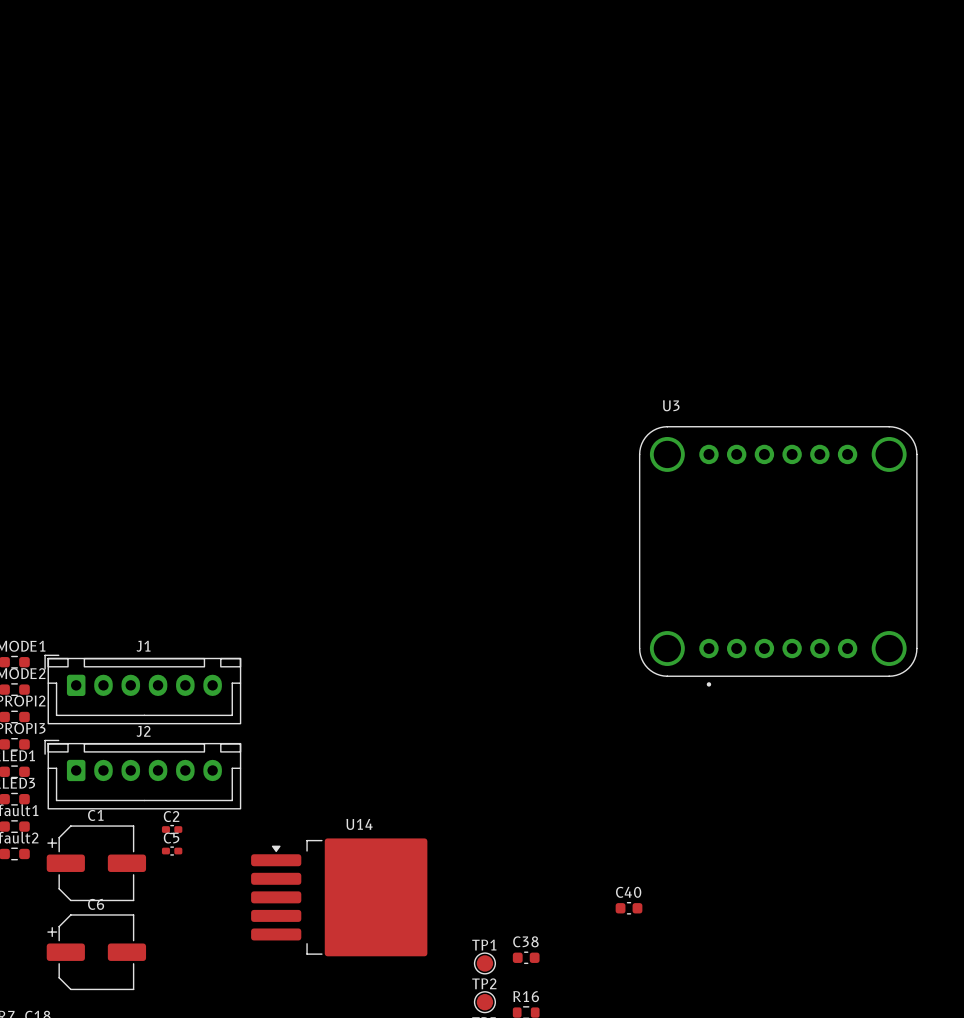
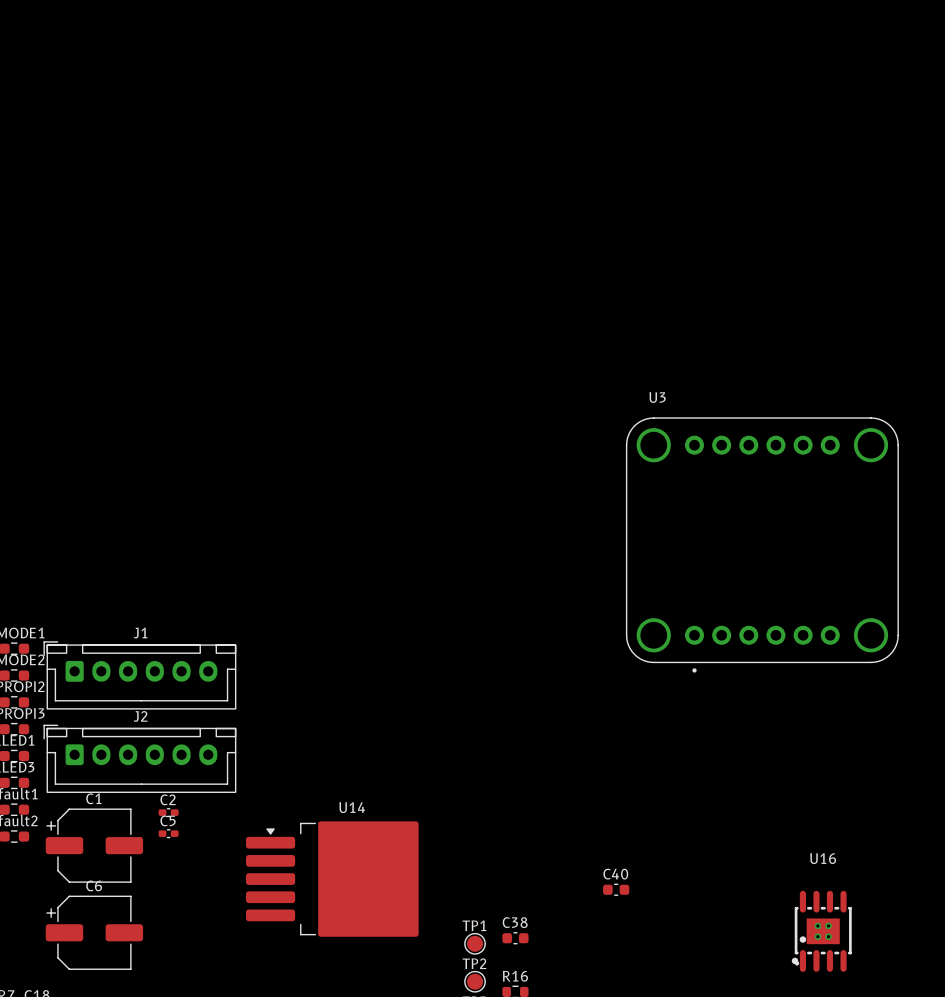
U16: none -> (821, 931)

